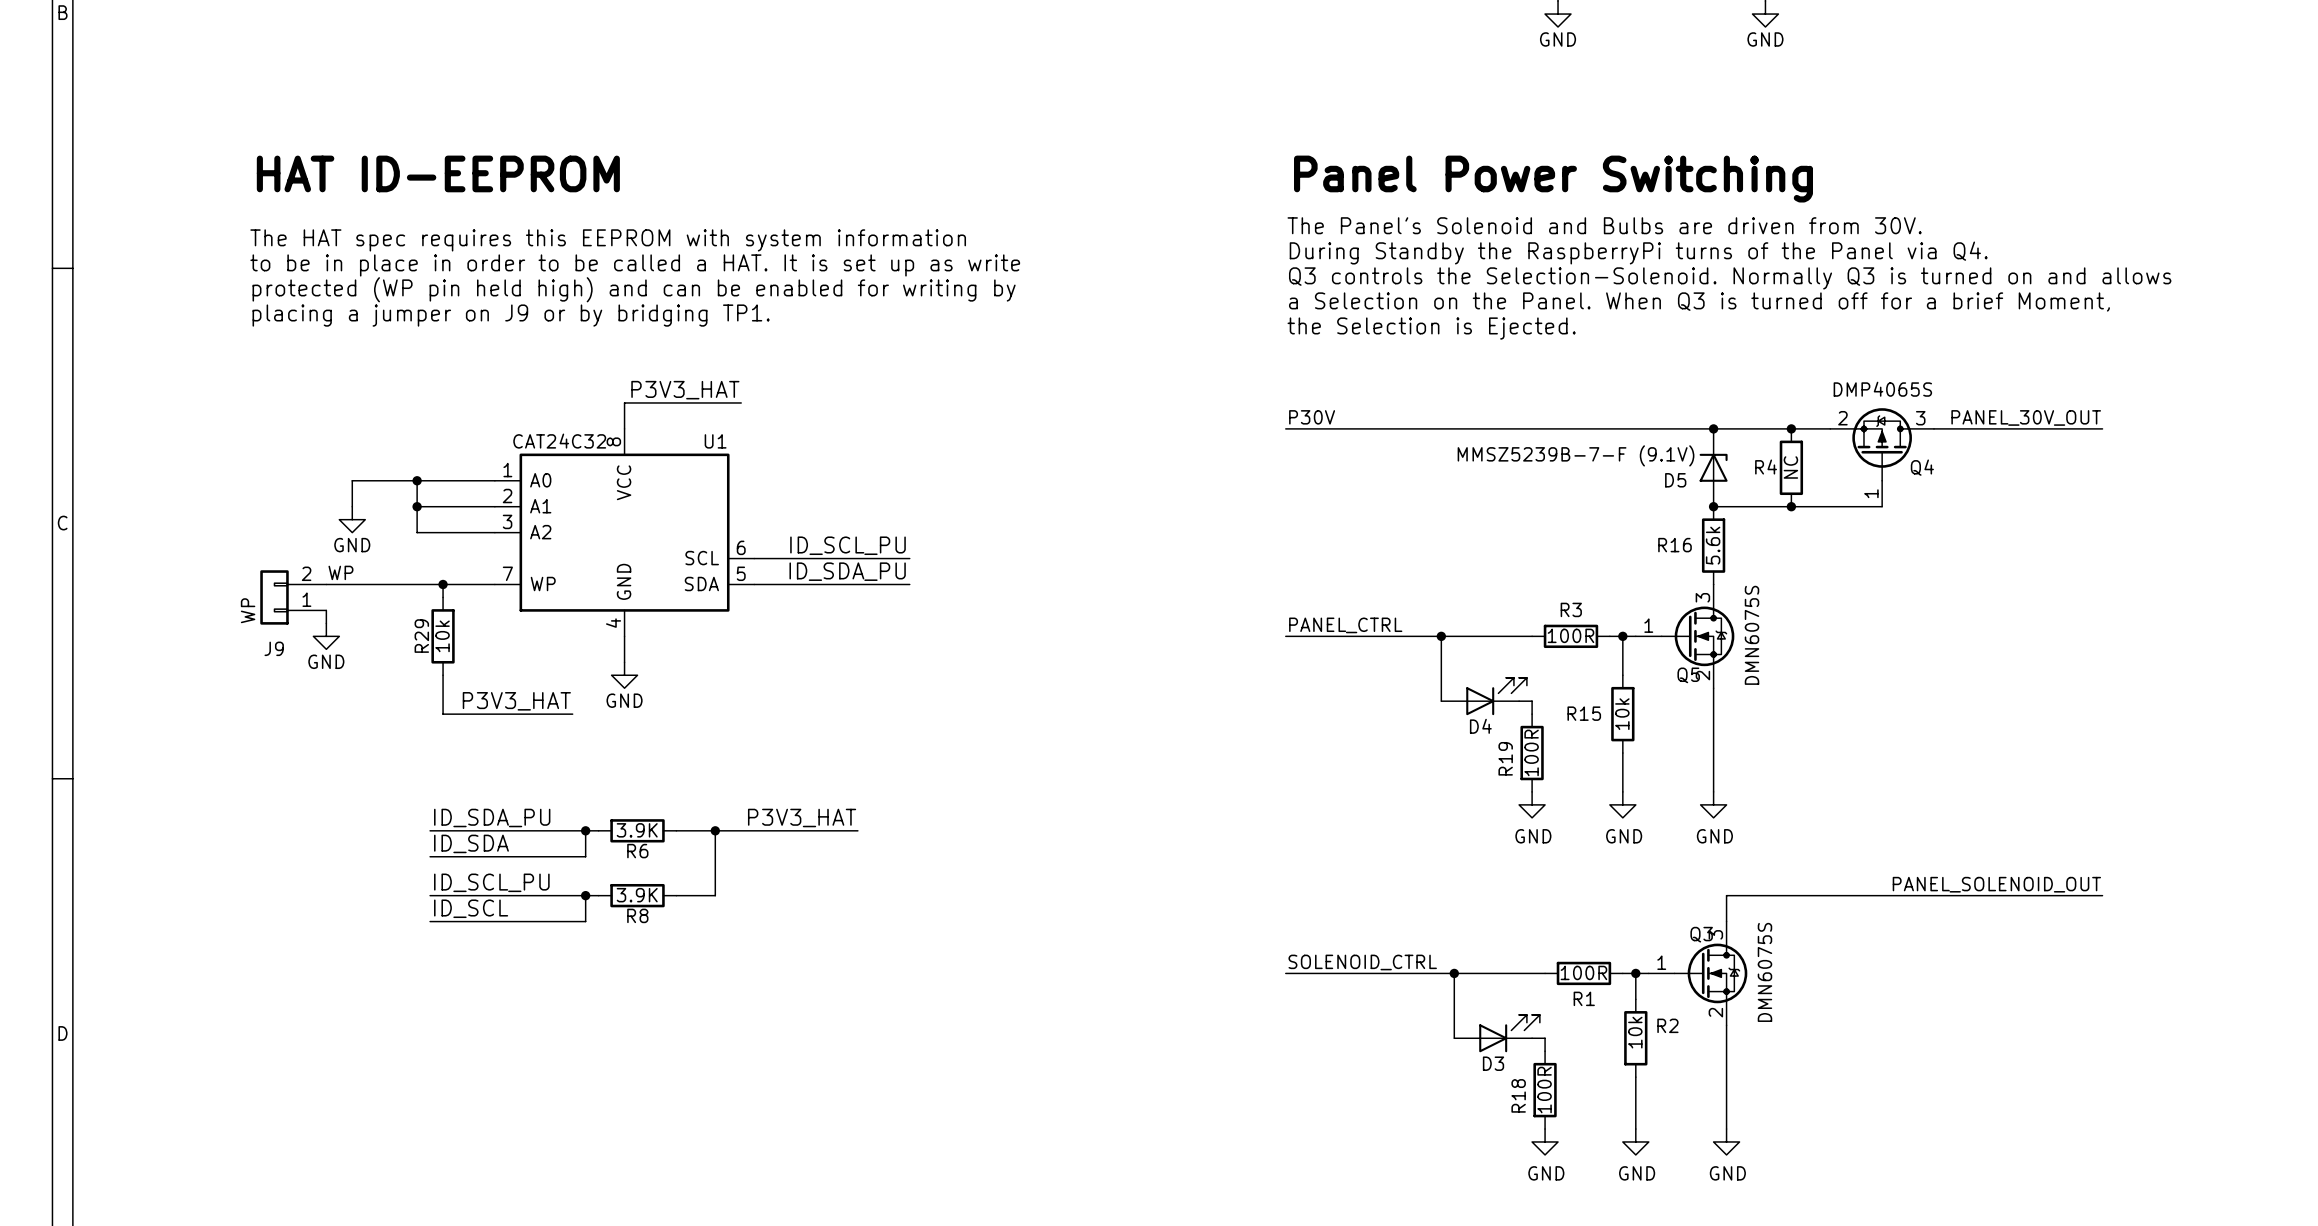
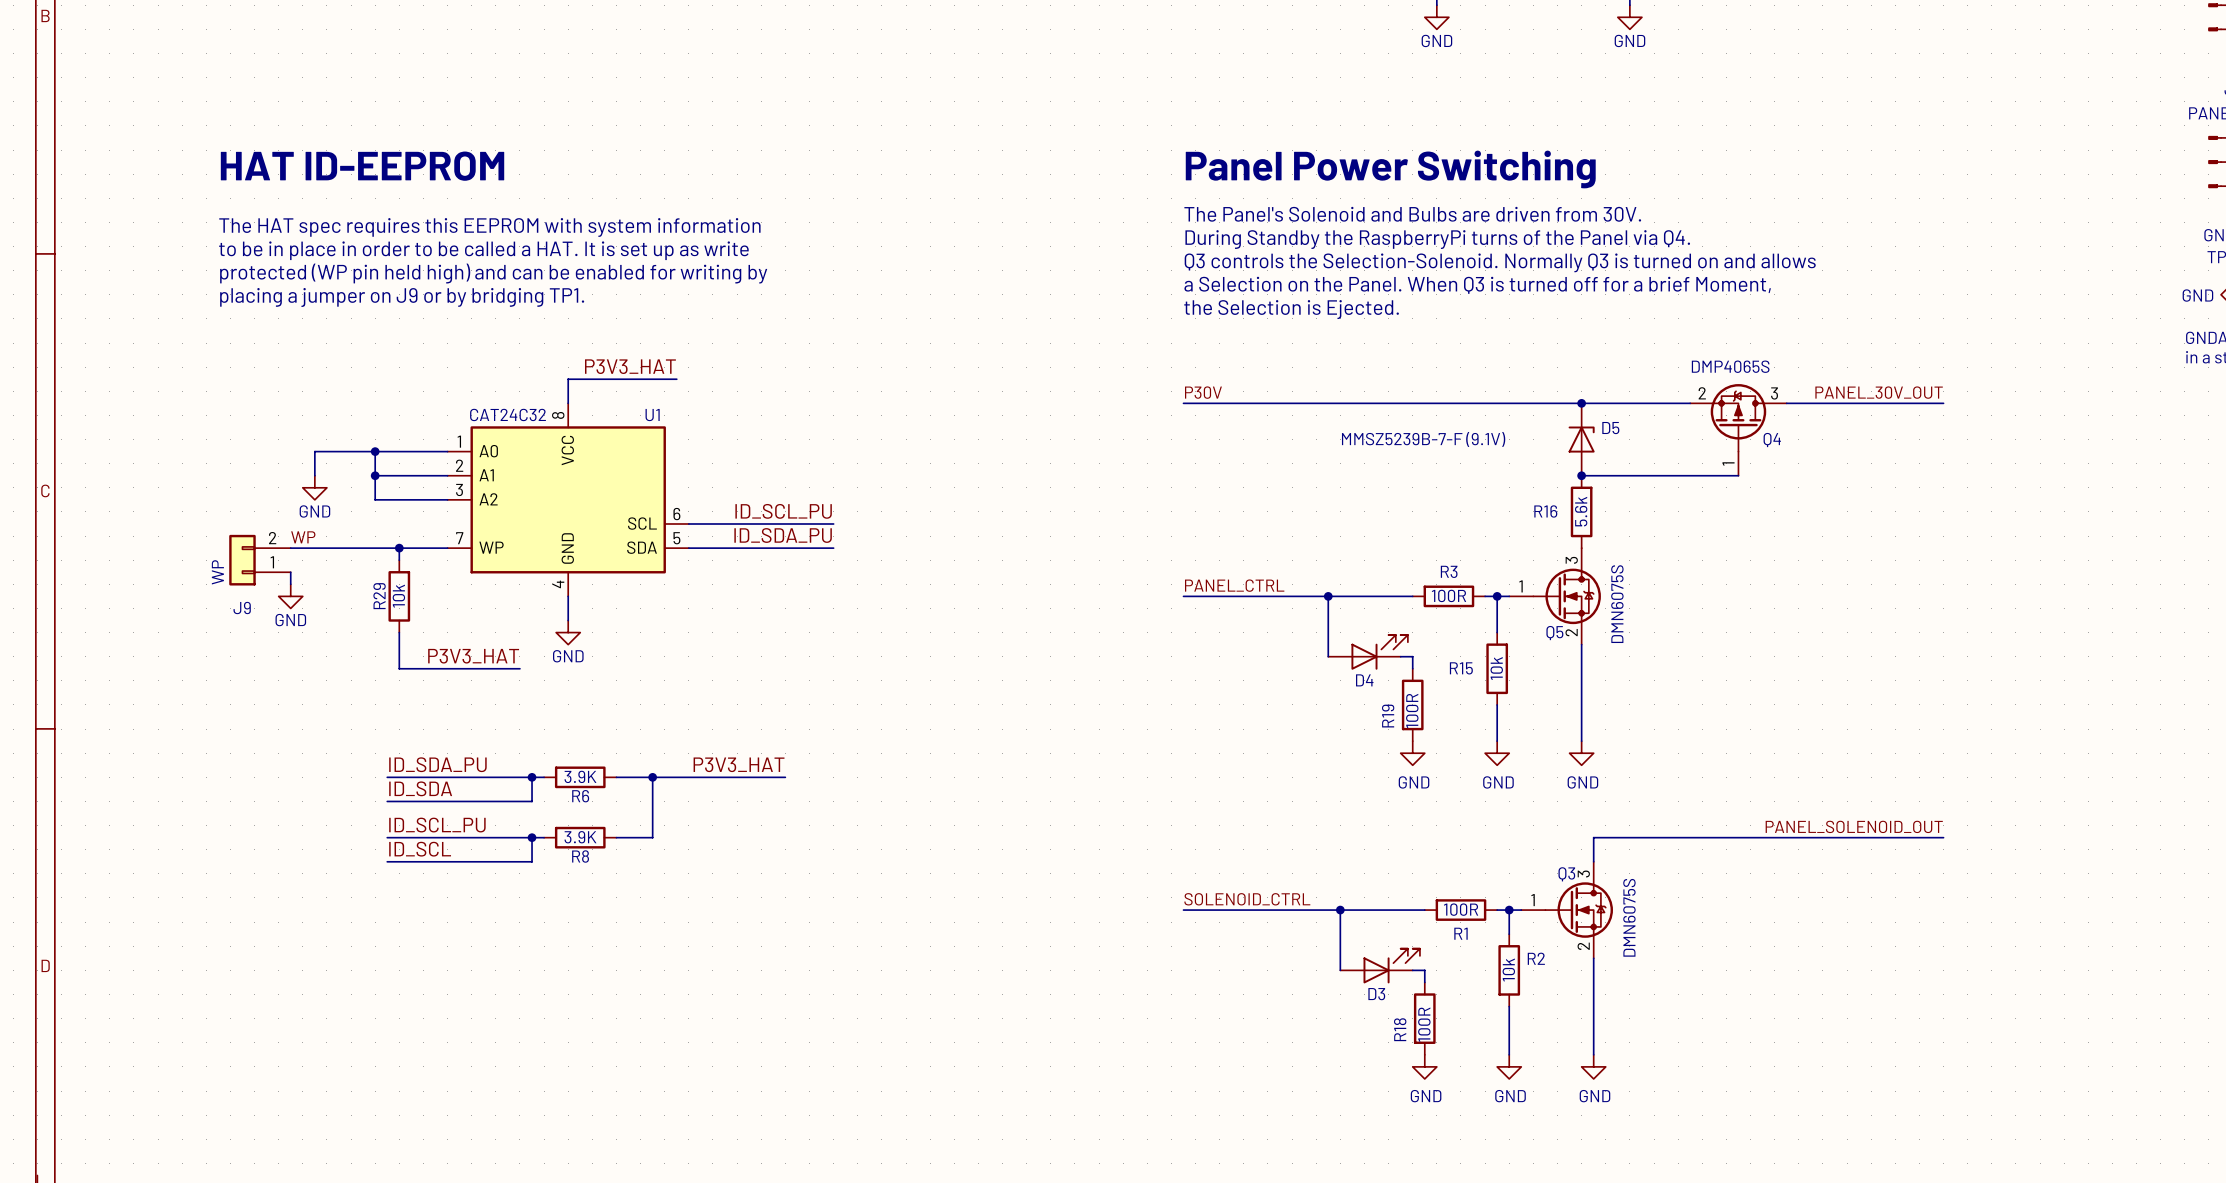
junction: (1791, 428) -> none
D5 value position: MMSZ5239B-7-F (9.1V) (1576, 455) -> MMSZ5239B-7-F (9.1V) (1423, 439)
R4: NC (1791, 467) -> none
D5 name position: D5 (1675, 480) -> D5 (1610, 428)
junction: (1791, 506) -> none

